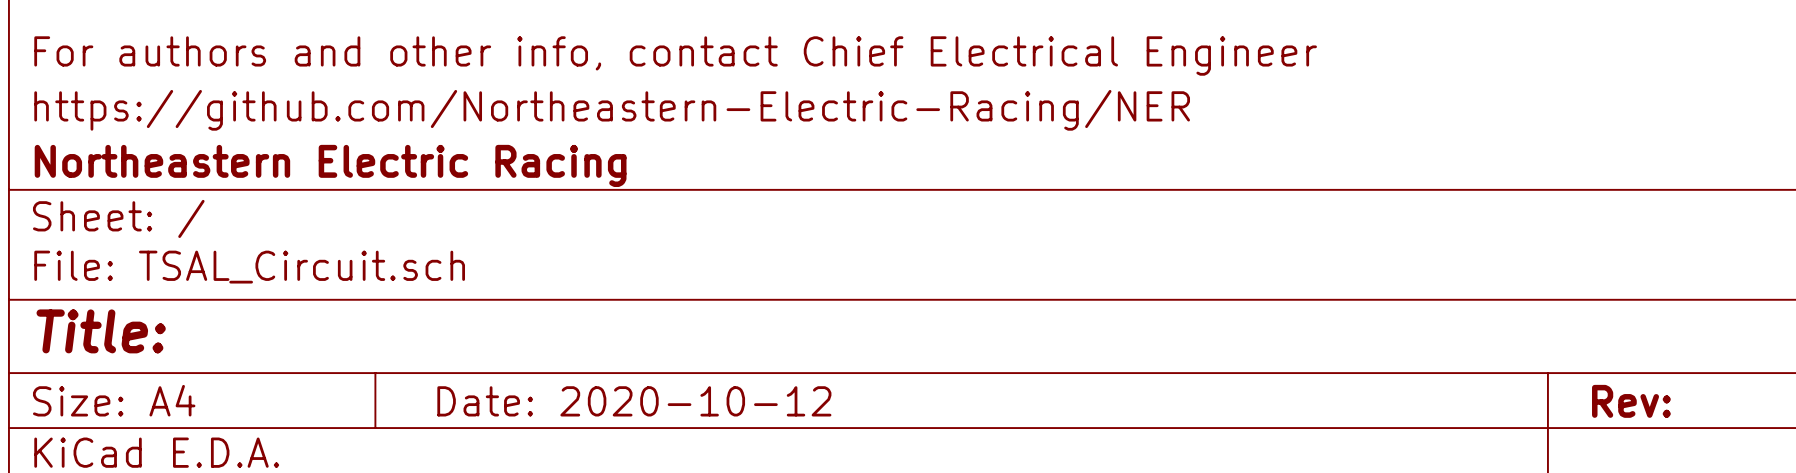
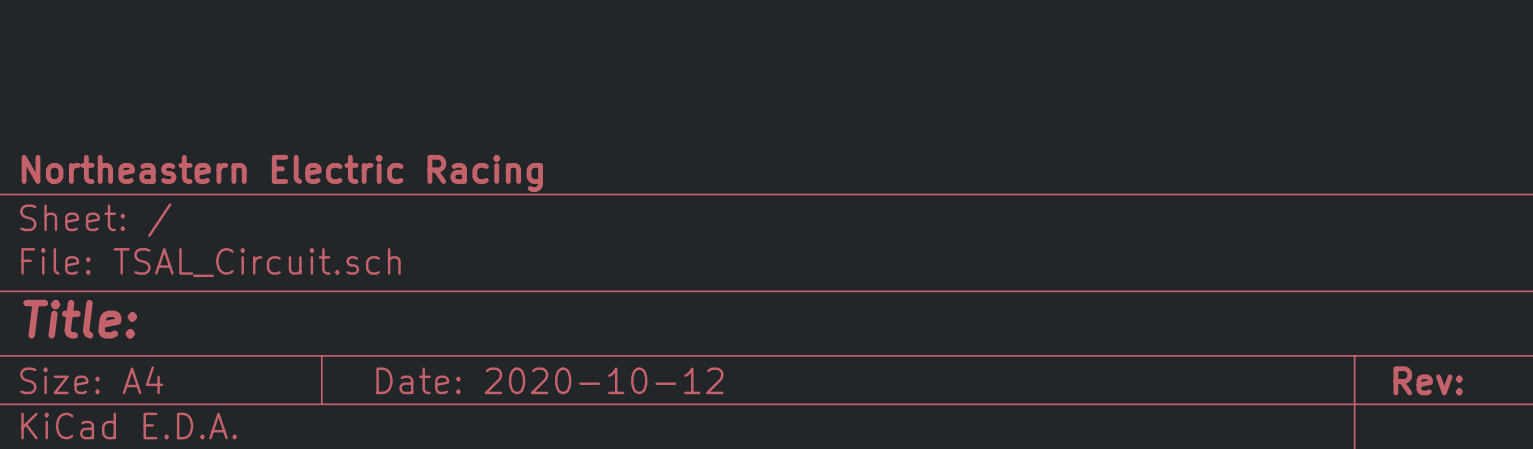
title block: For authors and other info, contact Chief Electrical Engineer (675, 56) -> none
title block: https://github.com/Northeastern-Electric-Racing/NER (612, 110) -> none

